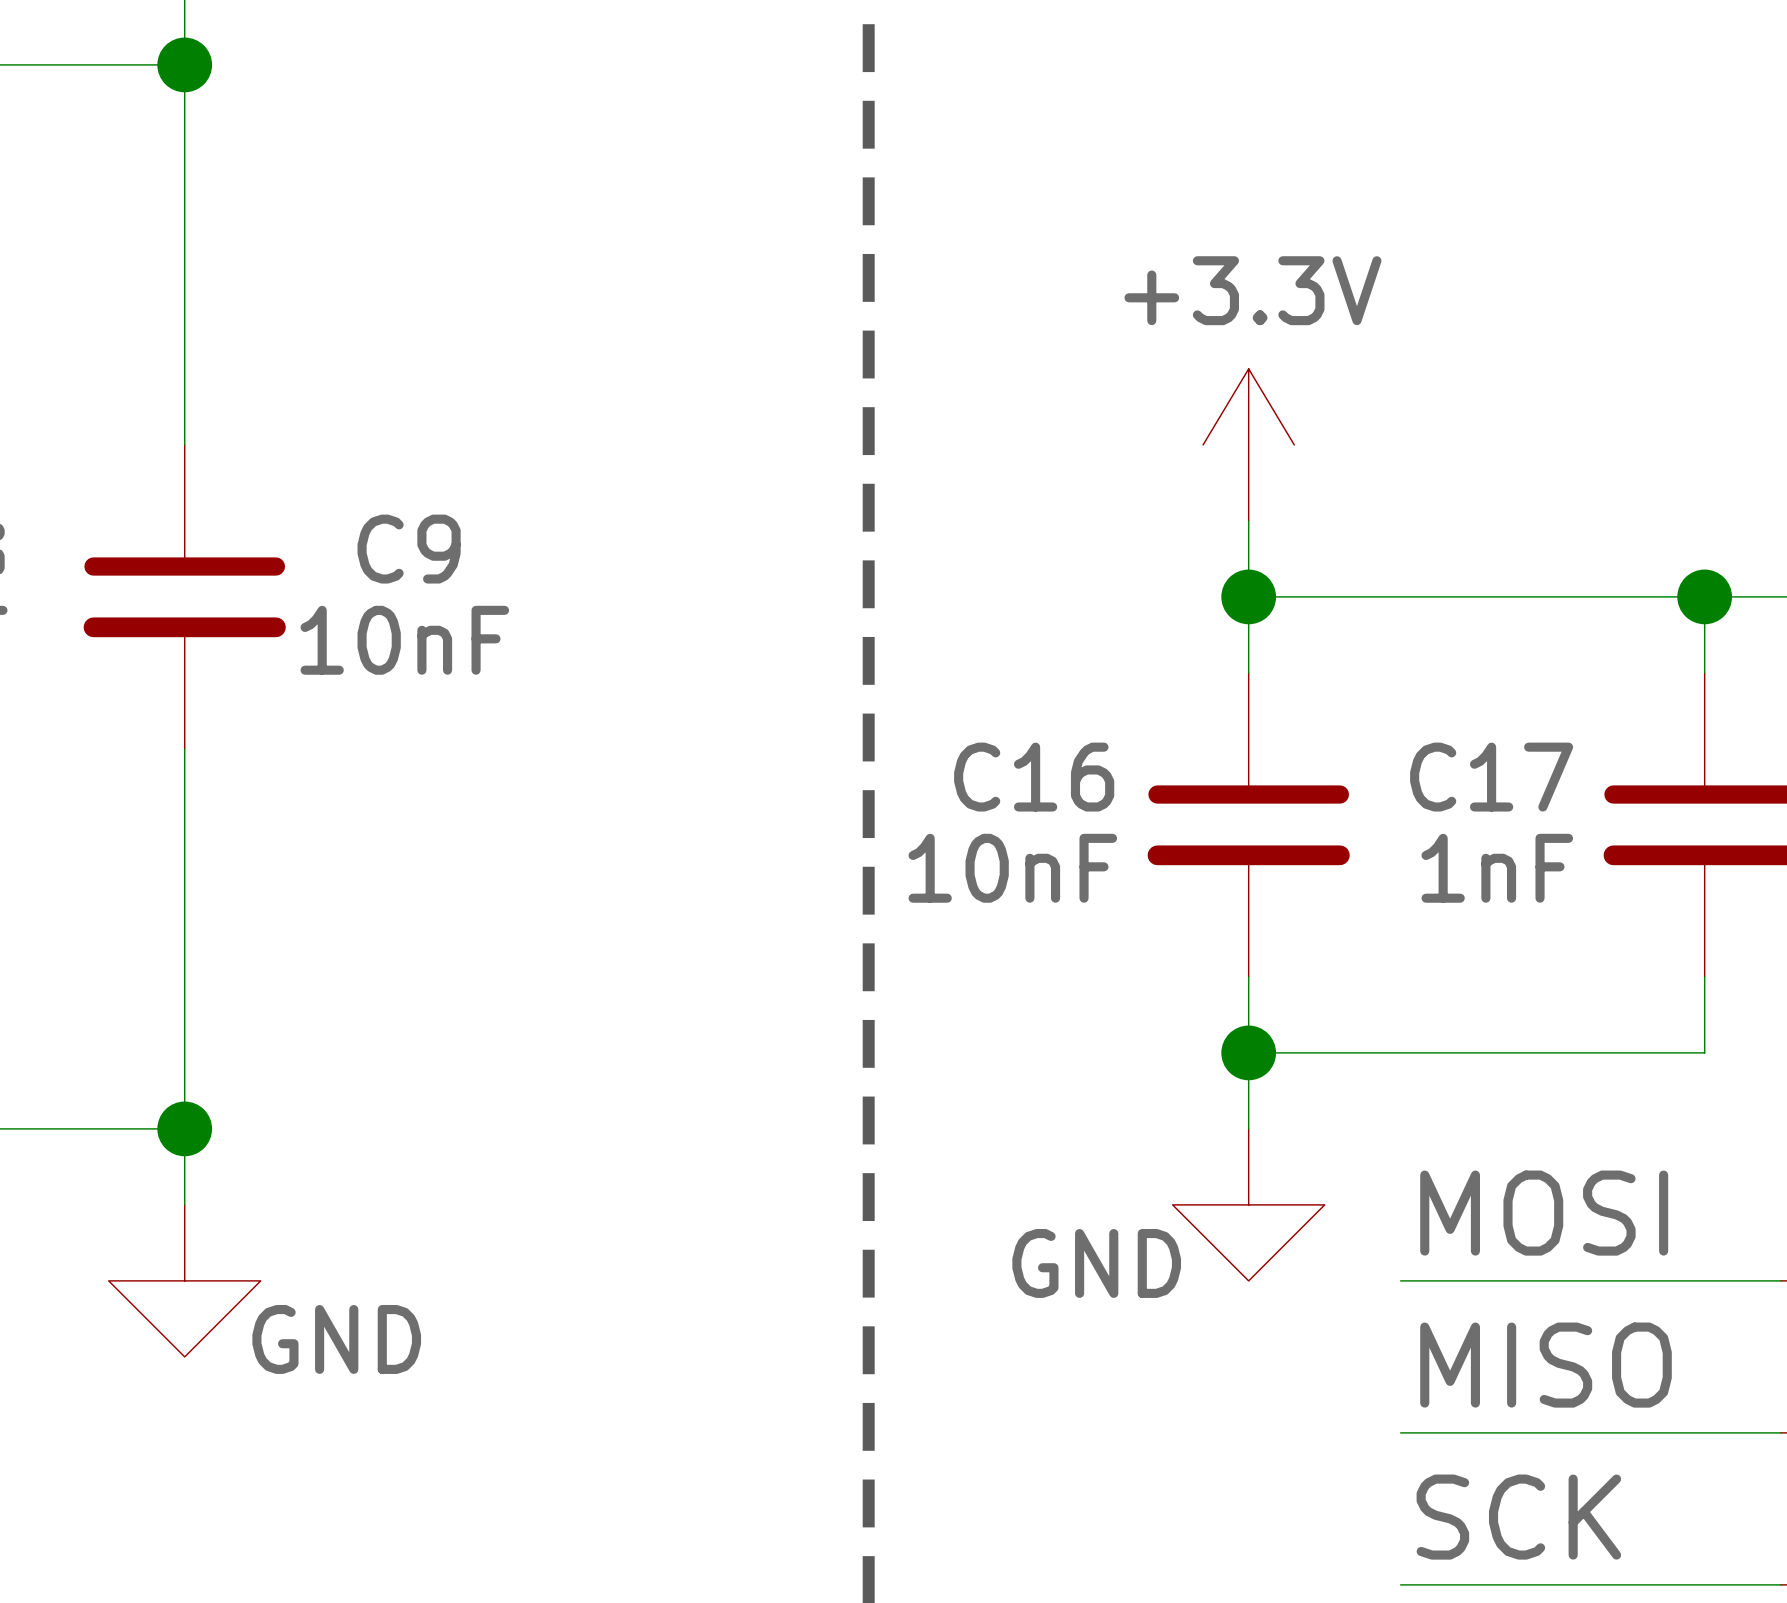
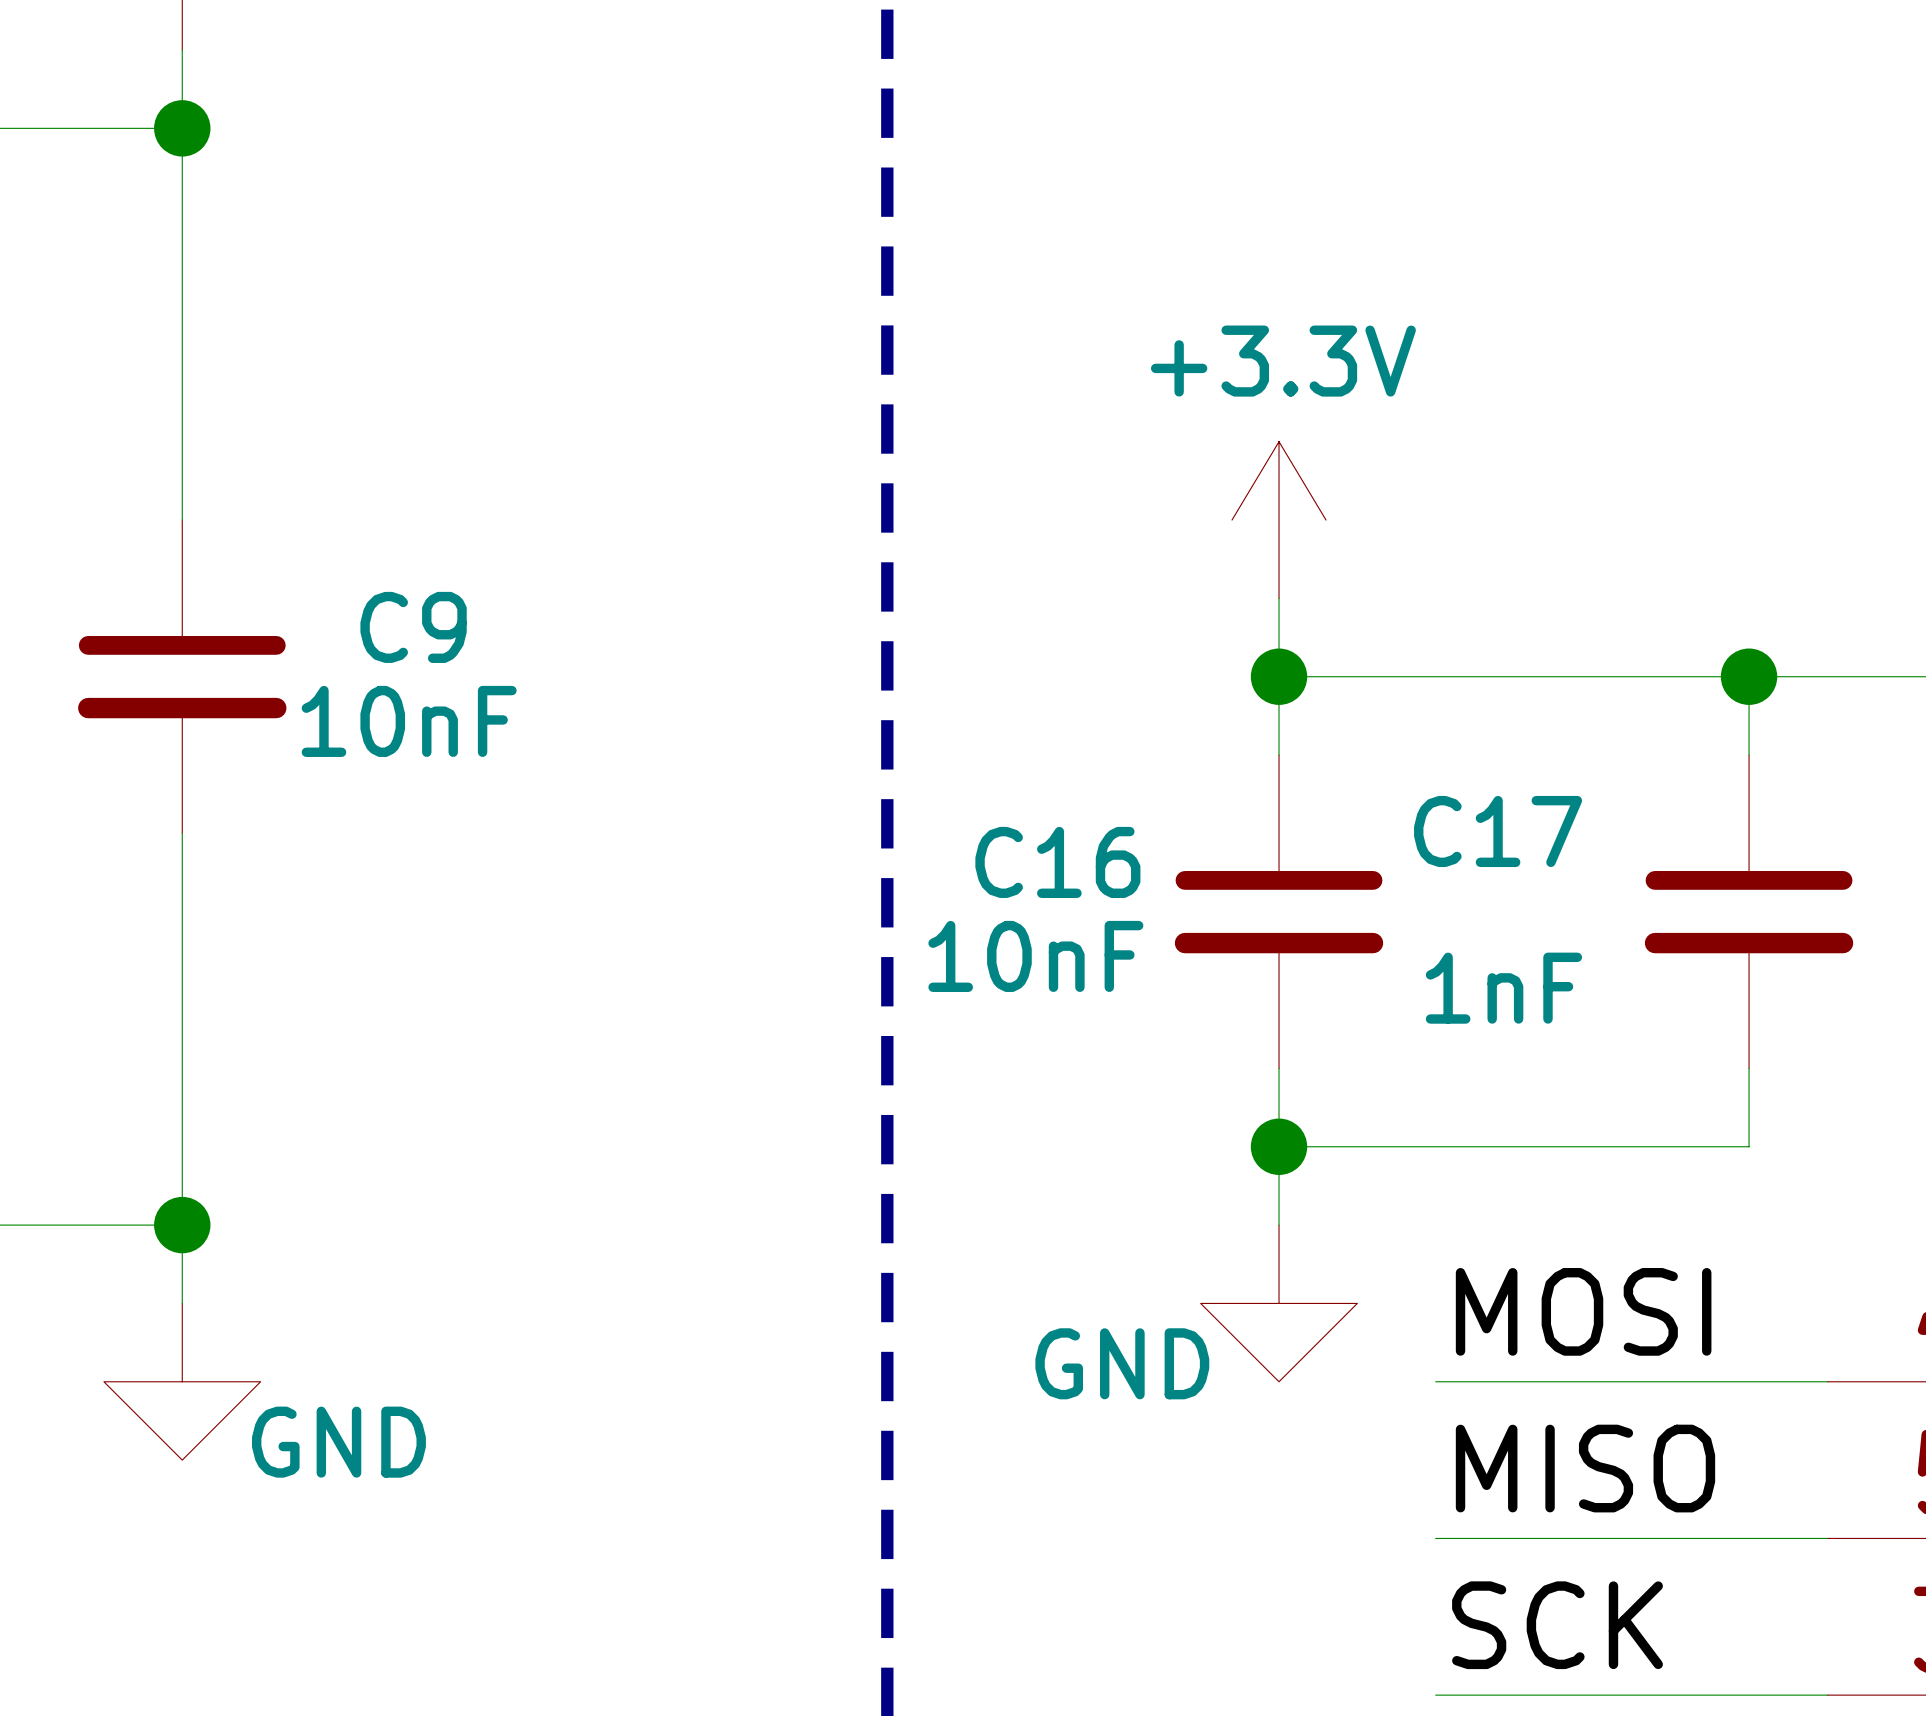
C17 name position: C17 (1491, 777) -> C17 (1498, 831)
C17 value position: 1nF (1497, 868) -> 1nF (1503, 988)

